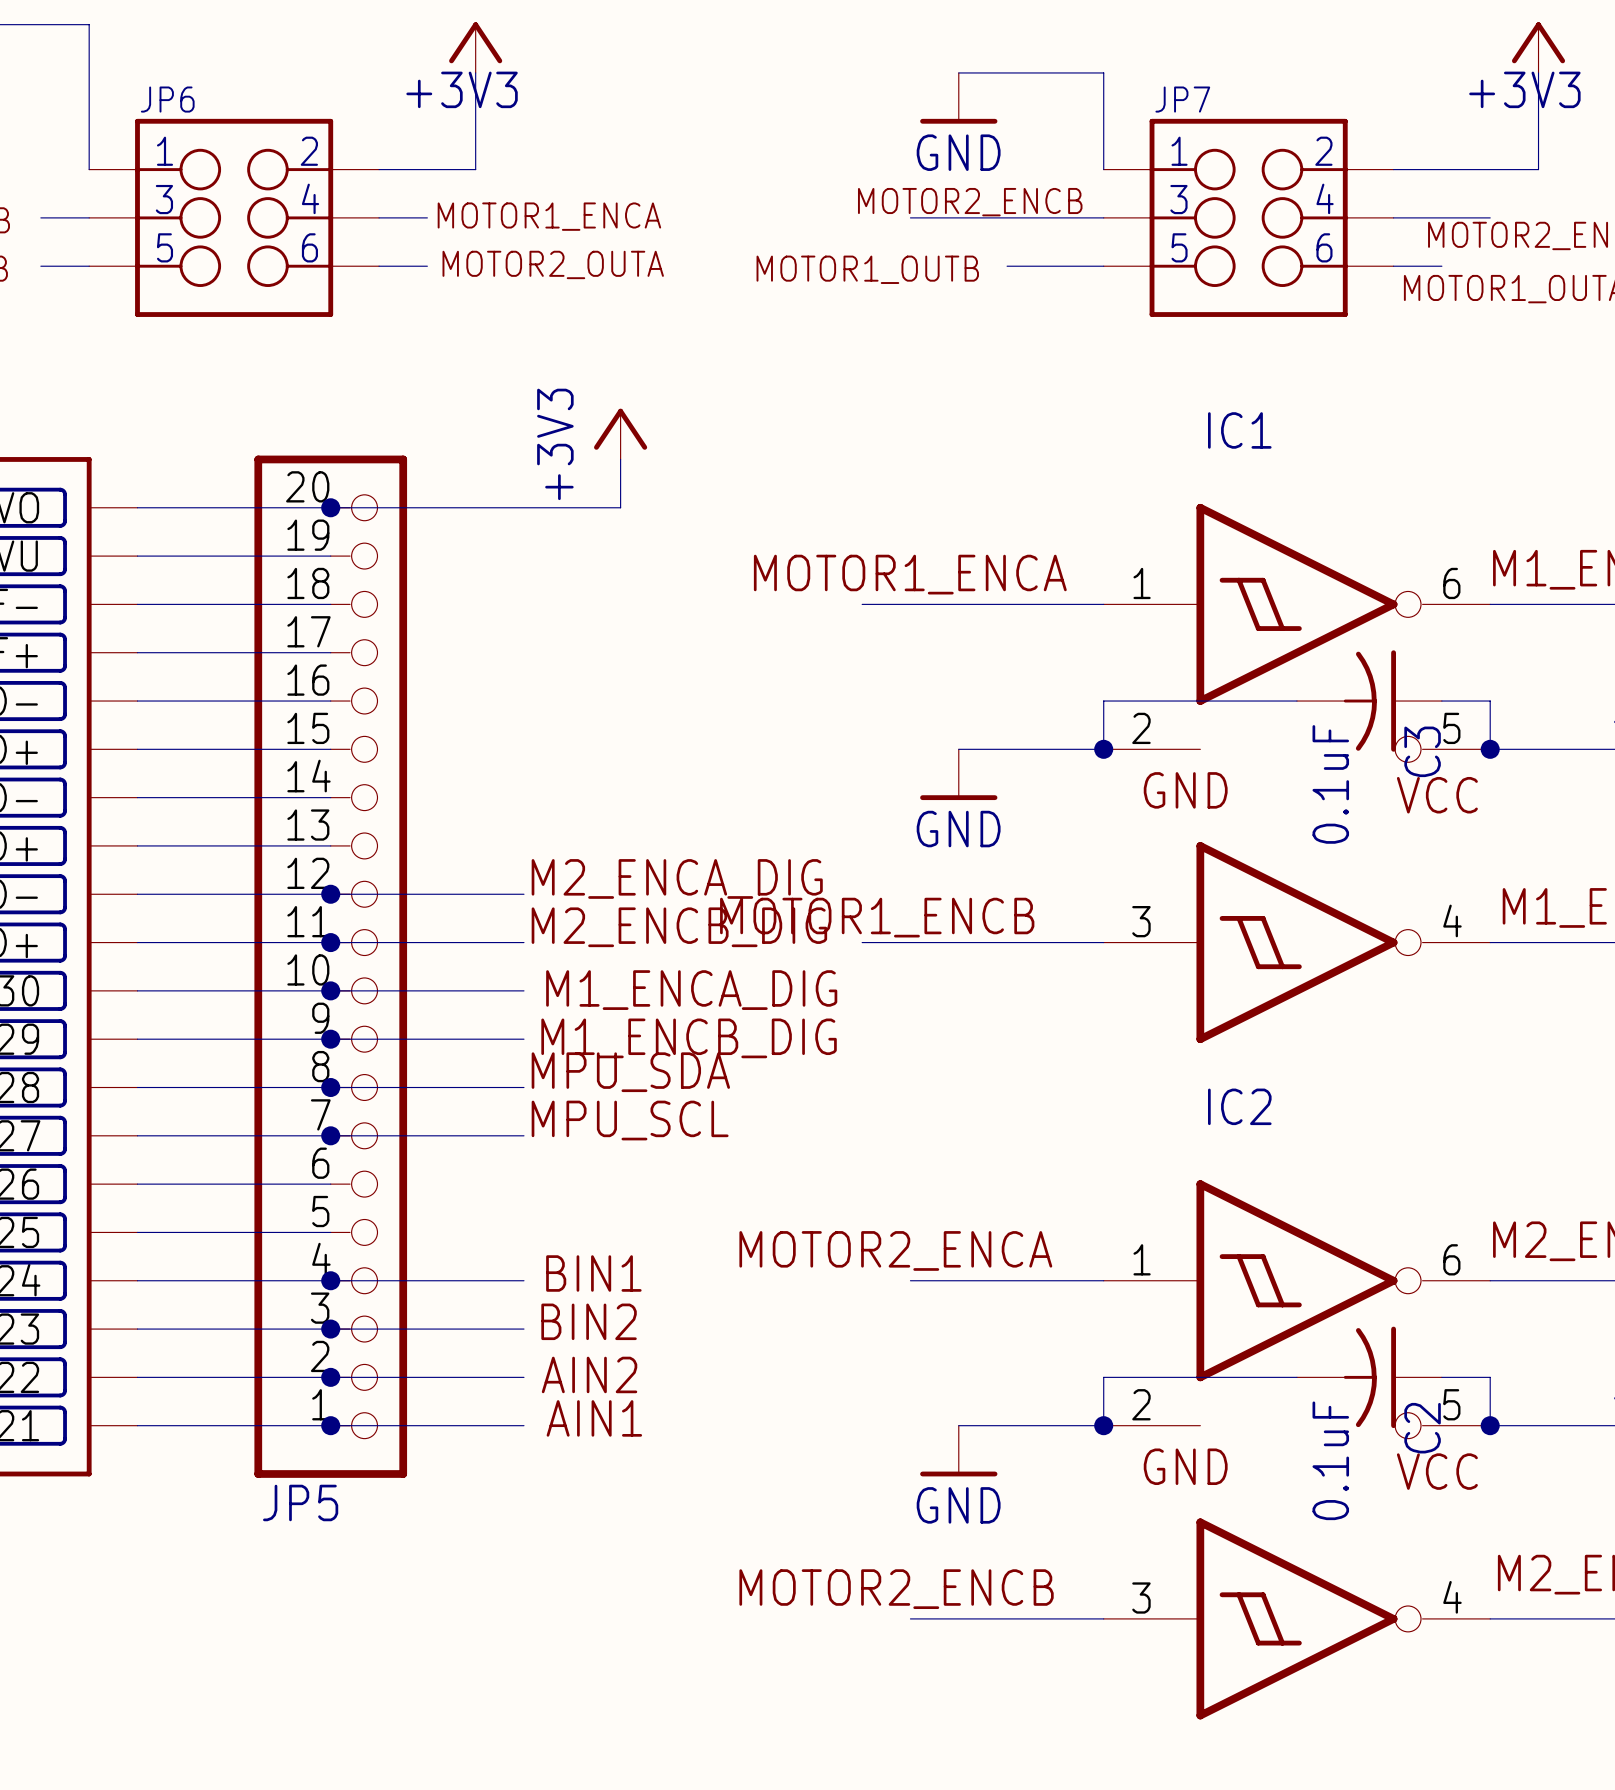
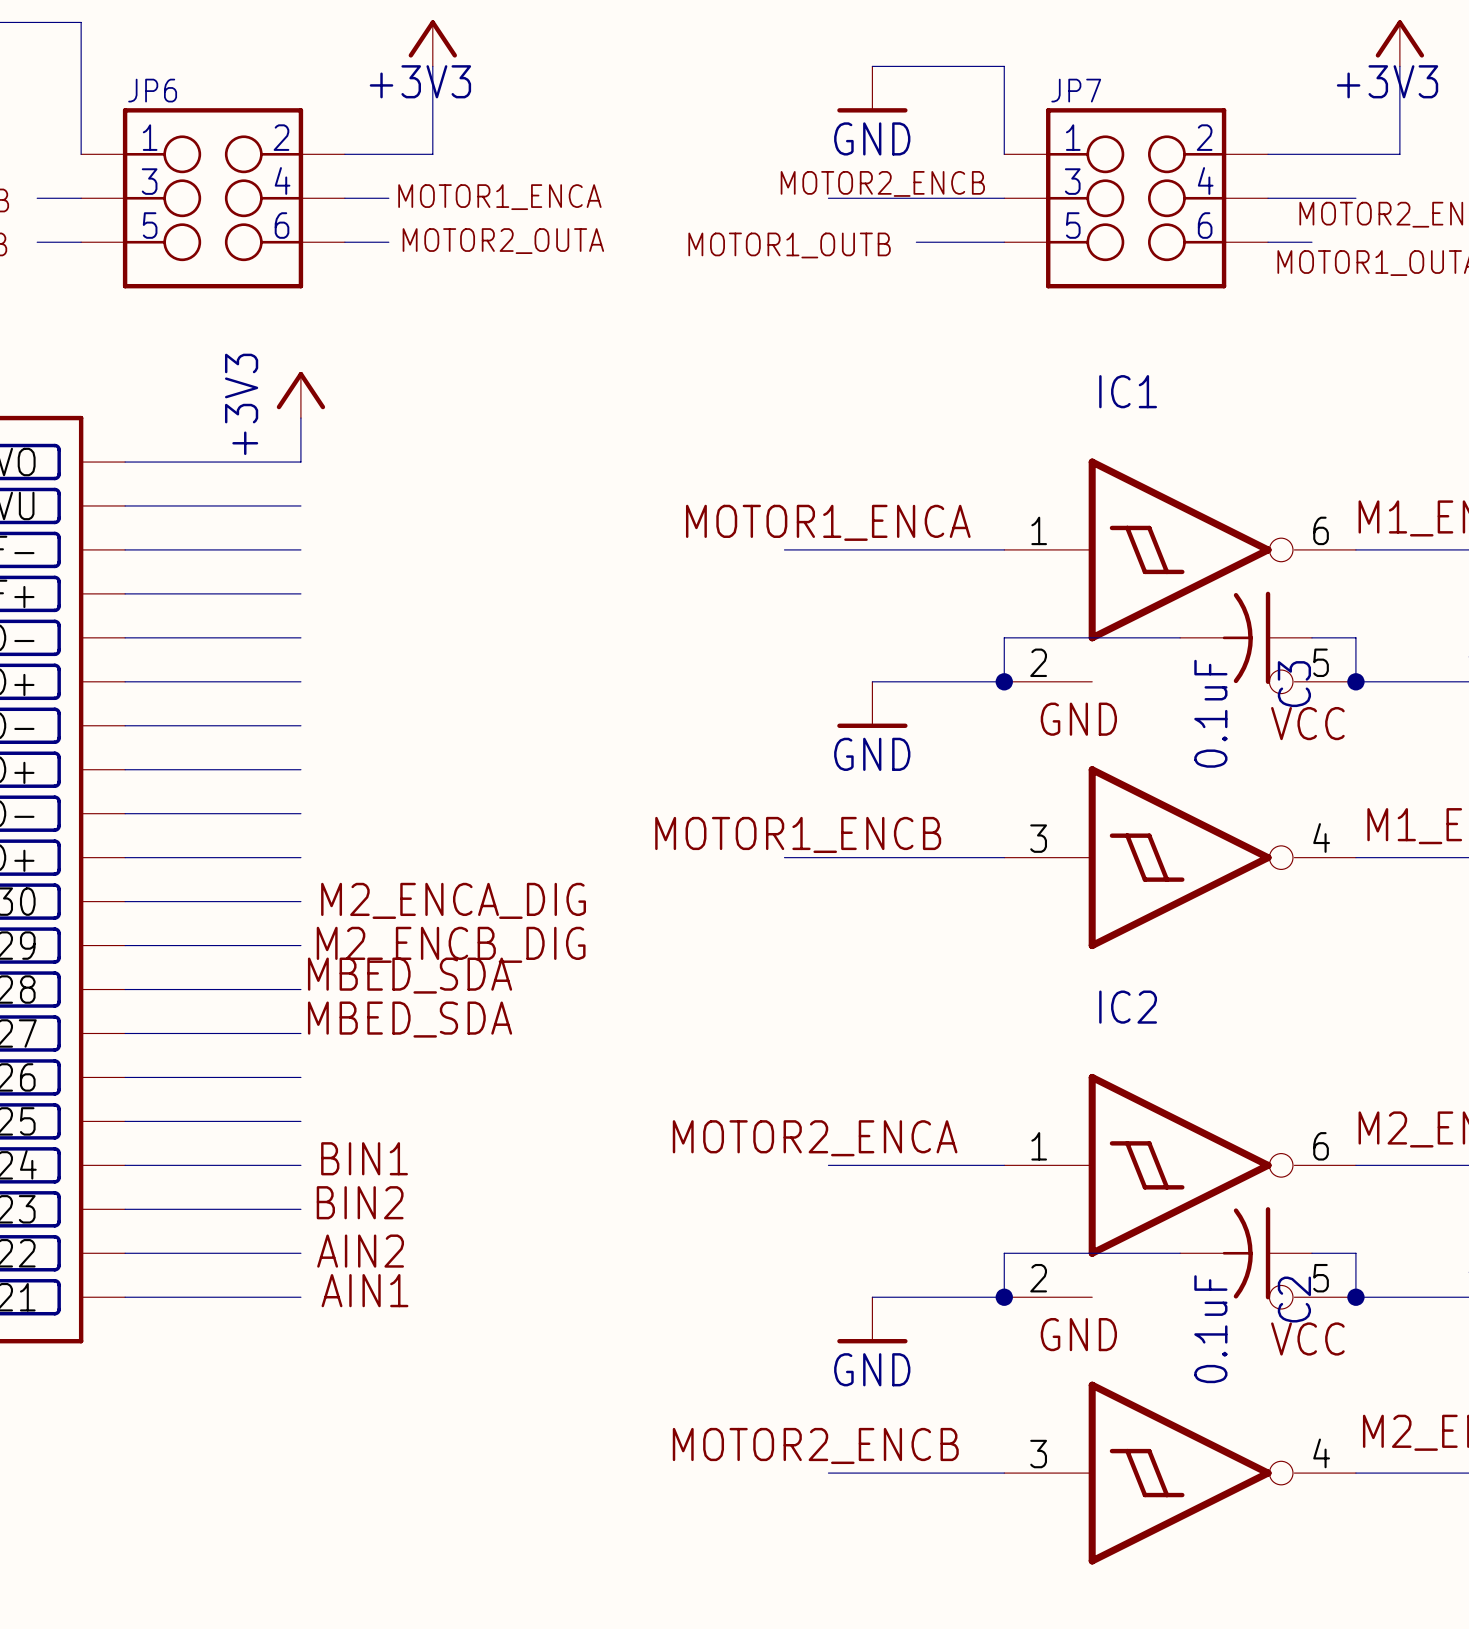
power symbol position: +3V3 (620, 434) -> +3V3 (300, 394)
wire: (620, 459) (620, 507) (330, 507) -> (300, 418) (300, 462)
junction: (330, 507) -> none
label position: M2_ENCA_DIG (677, 878) -> M2_ENCA_DIG (453, 900)
wire: (330, 894) (523, 894) -> none
junction: (330, 894) -> none
label position: M2_ENCB_DIG (679, 927) -> M2_ENCB_DIG (451, 944)
wire: (330, 942) (523, 942) -> none
junction: (330, 942) -> none
JP5: (330, 966) -> none
wire: (330, 990) (523, 990) -> none
junction: (330, 990) -> none
label: M1_ENCA_DIG (691, 990) -> none
label: M1_ENCB_DIG (689, 1038) -> none
wire: (330, 1039) (523, 1039) -> none
junction: (330, 1039) -> none
label: none -> MBED_SDA (410, 975)
label: MPU_SDA (630, 1072) -> none
wire: (330, 1087) (523, 1087) -> none
junction: (330, 1087) -> none
label: none -> MBED_SDA (410, 1019)
label: MPU_SCL (630, 1120) -> none
wire: (330, 1135) (523, 1135) -> none
junction: (330, 1135) -> none
label position: BIN1 (593, 1273) -> BIN1 (364, 1158)
wire: (330, 1280) (523, 1280) -> none
junction: (330, 1280) -> none
label position: BIN2 (589, 1321) -> BIN2 (360, 1202)
wire: (330, 1329) (523, 1329) -> none
junction: (330, 1329) -> none
label position: AIN2 (589, 1374) -> AIN2 (360, 1251)
wire: (330, 1377) (523, 1377) -> none
junction: (330, 1377) -> none
label position: AIN1 (594, 1418) -> AIN1 (364, 1290)
wire: (330, 1425) (523, 1425) -> none
junction: (330, 1425) -> none

